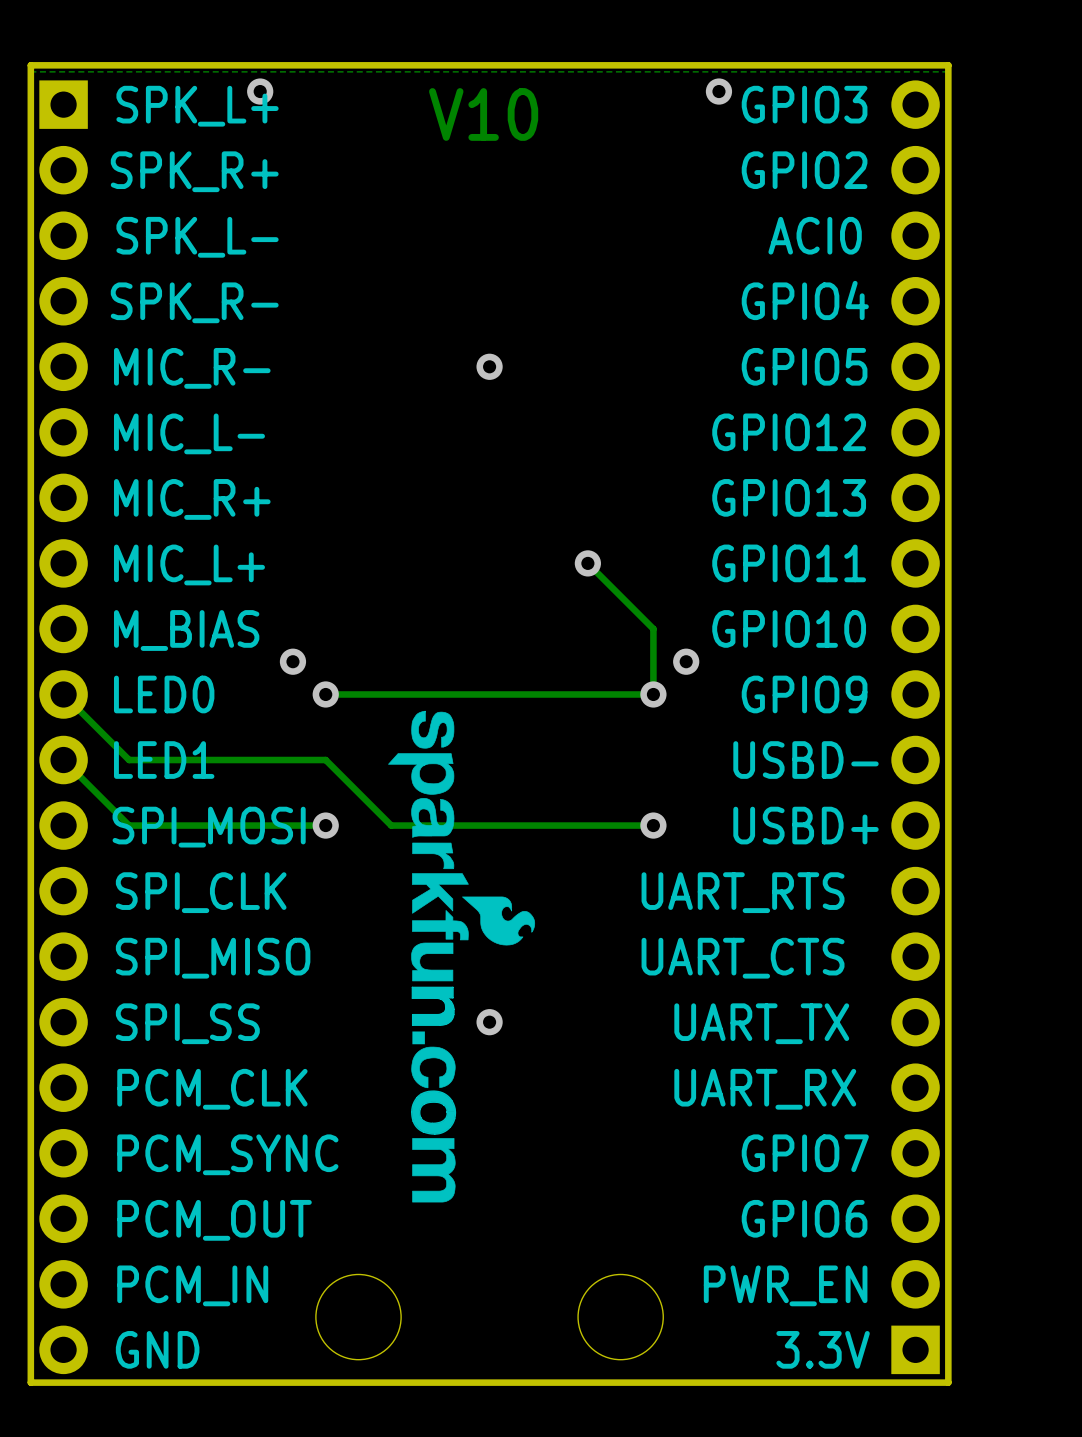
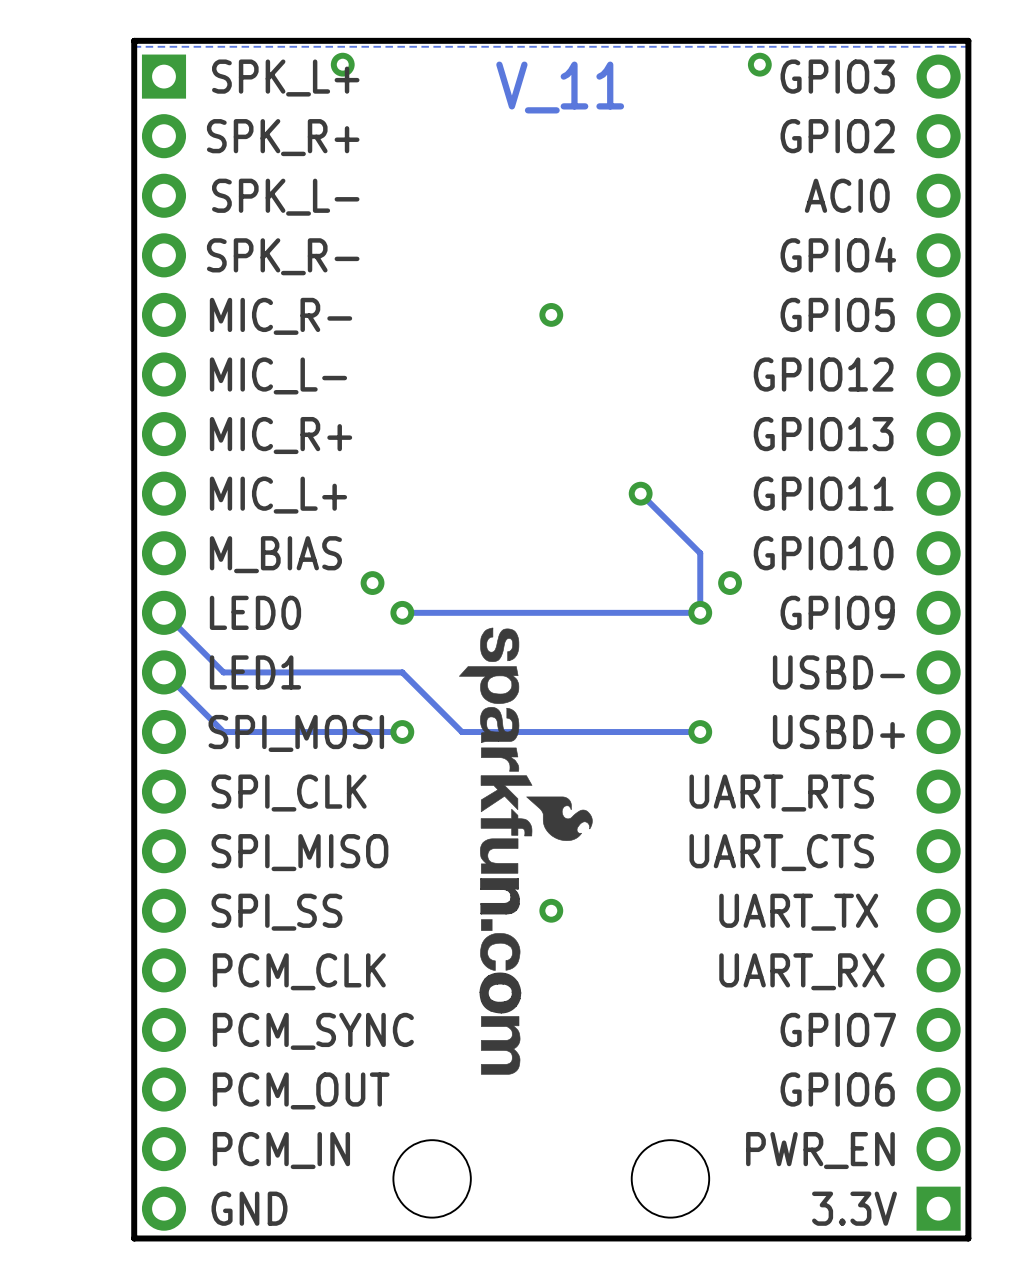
text: V10 (483, 114) -> V_11 (560, 87)

